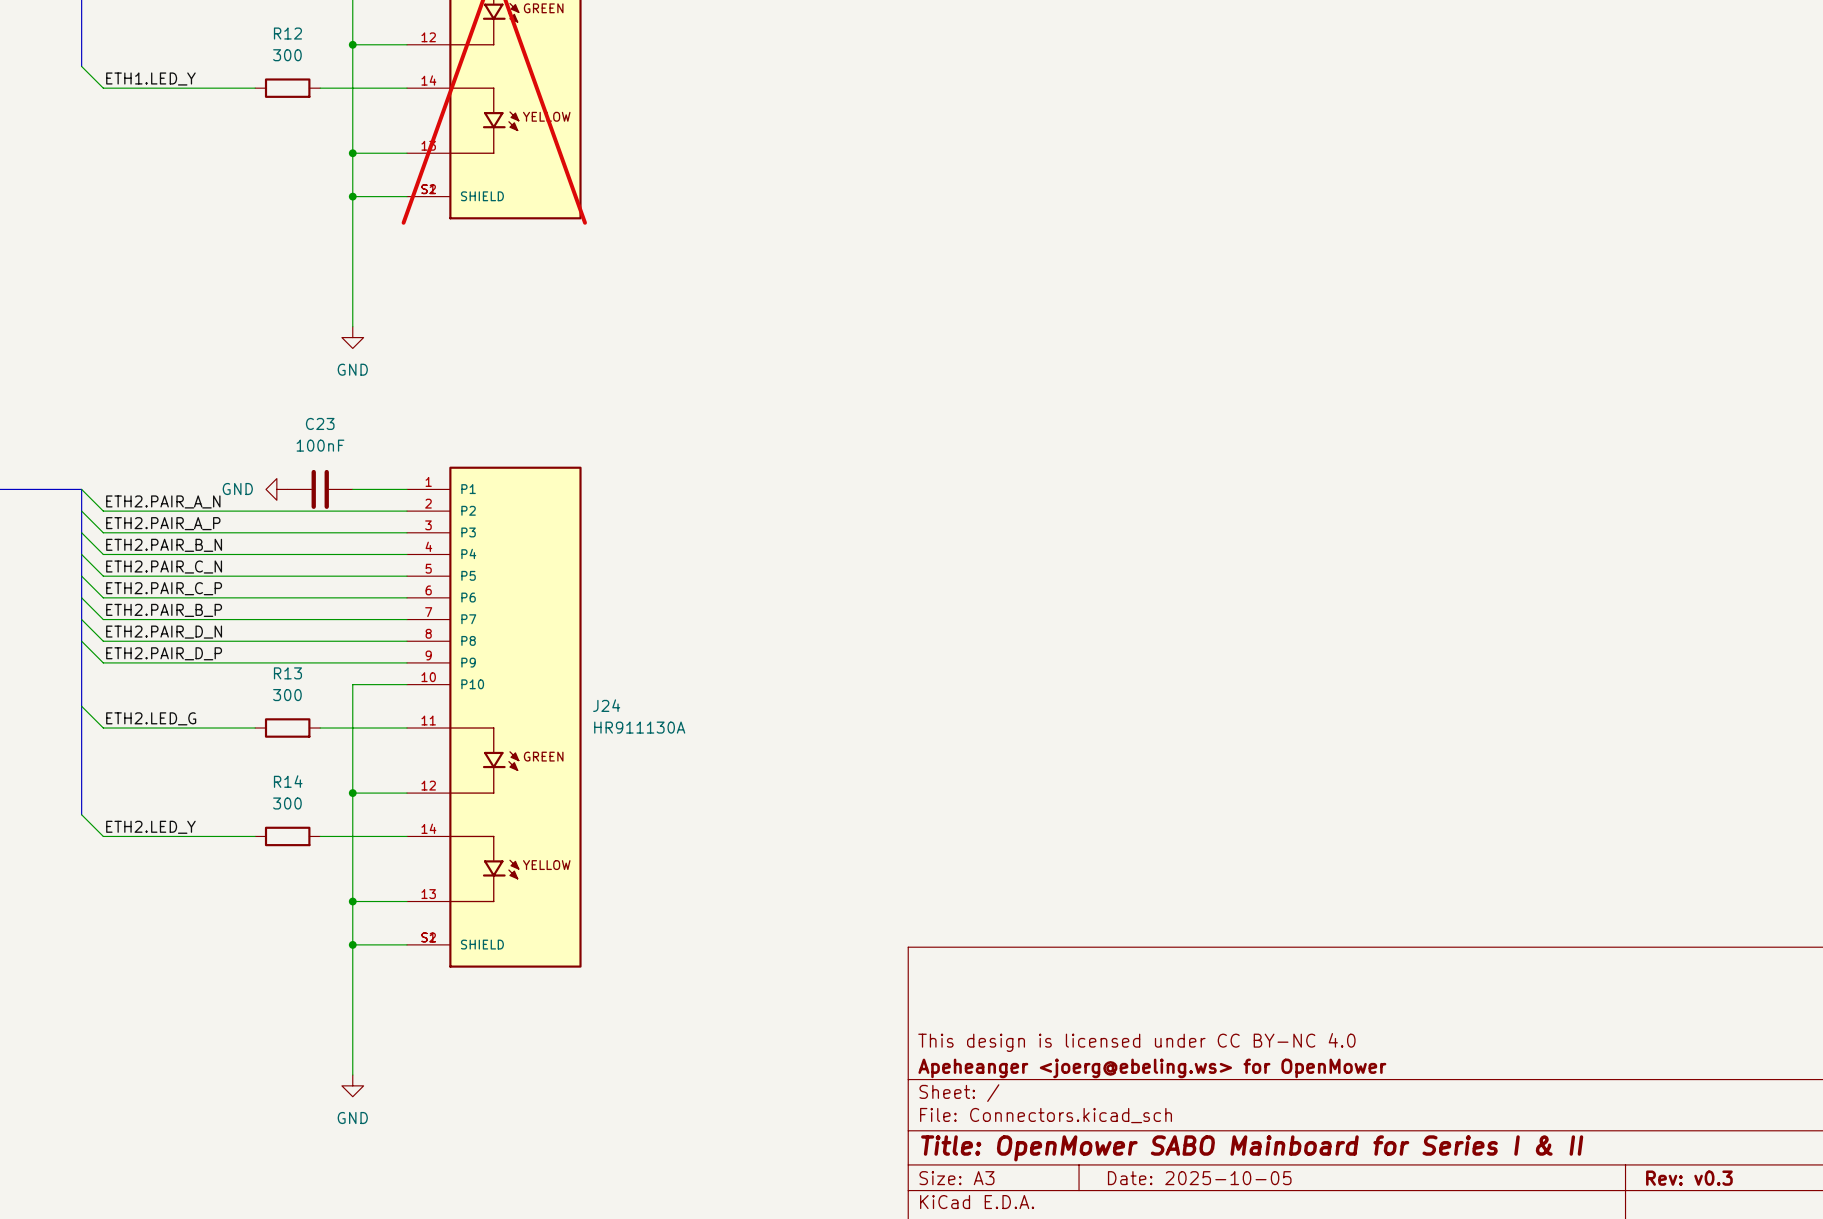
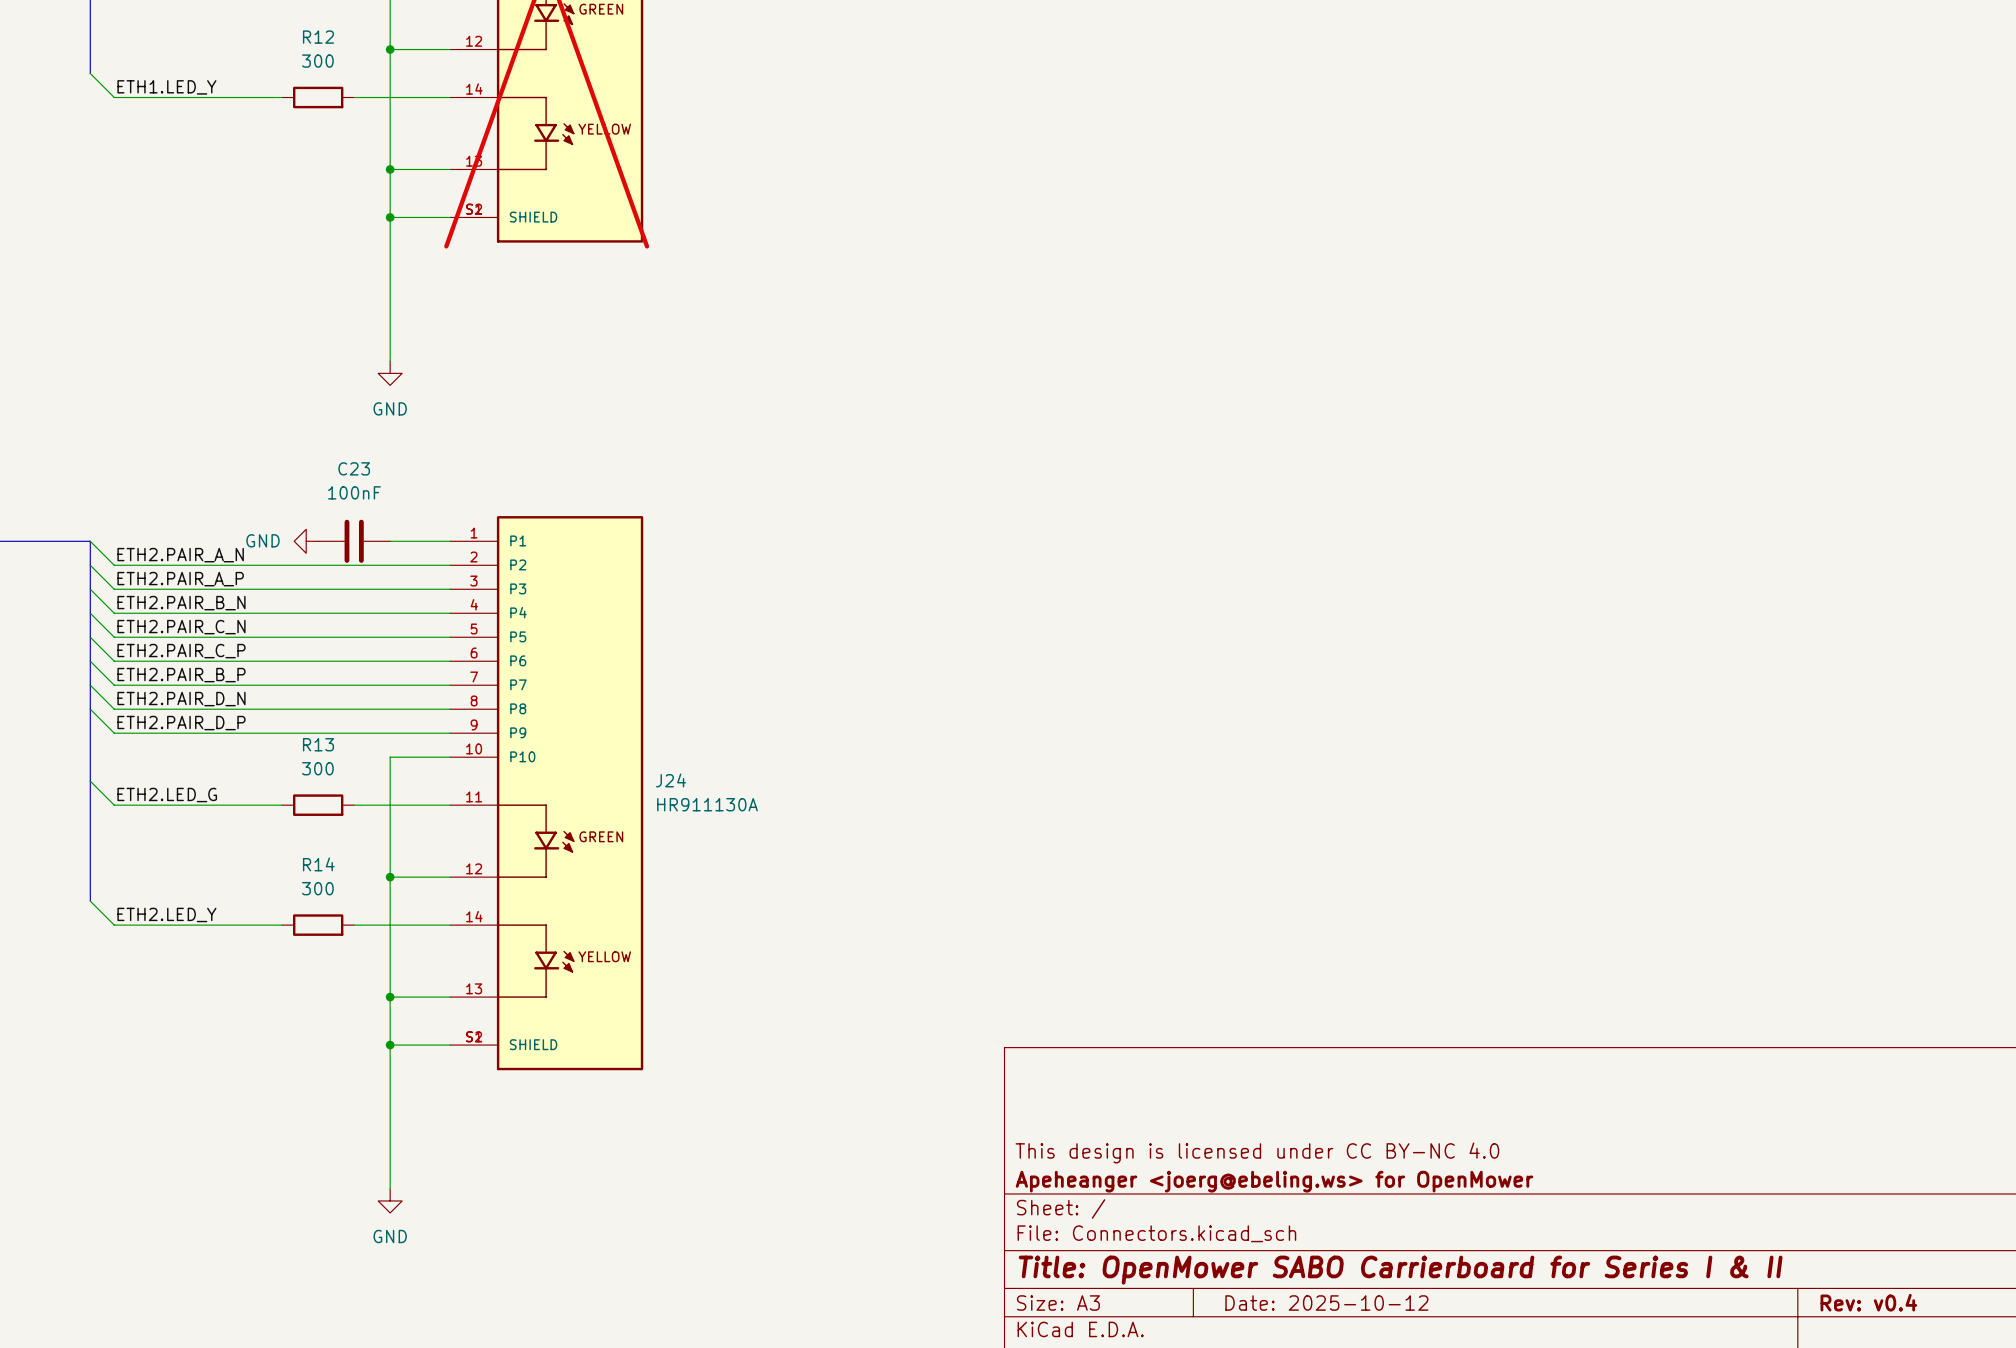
title block: Title: OpenMower SABO Mainboard for Series I & II (1252, 1148) -> Title: OpenMower SABO Carrierboard for Series I & II (1400, 1270)
title block: Date: 2025-10-05 (1199, 1178) -> Date: 2025-10-12 (1326, 1303)
title block: Rev: v0.3 (1689, 1178) -> Rev: v0.4 (1868, 1302)

